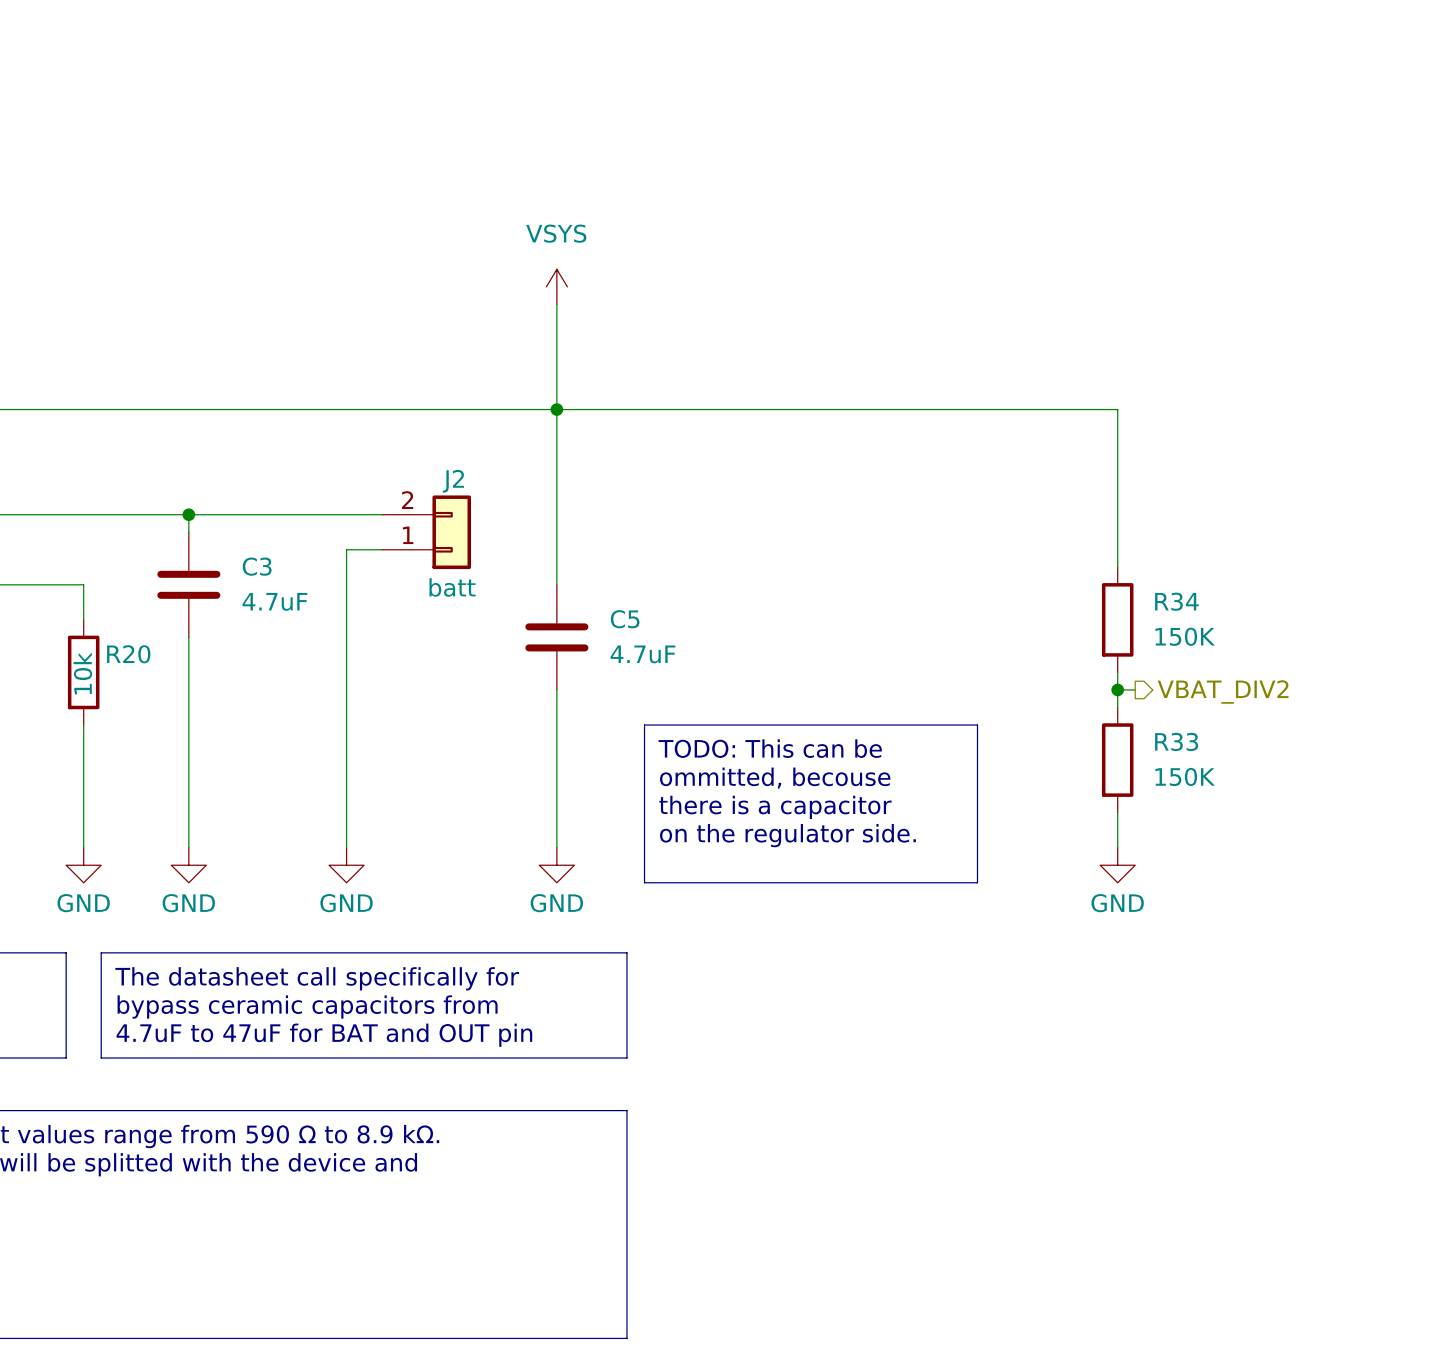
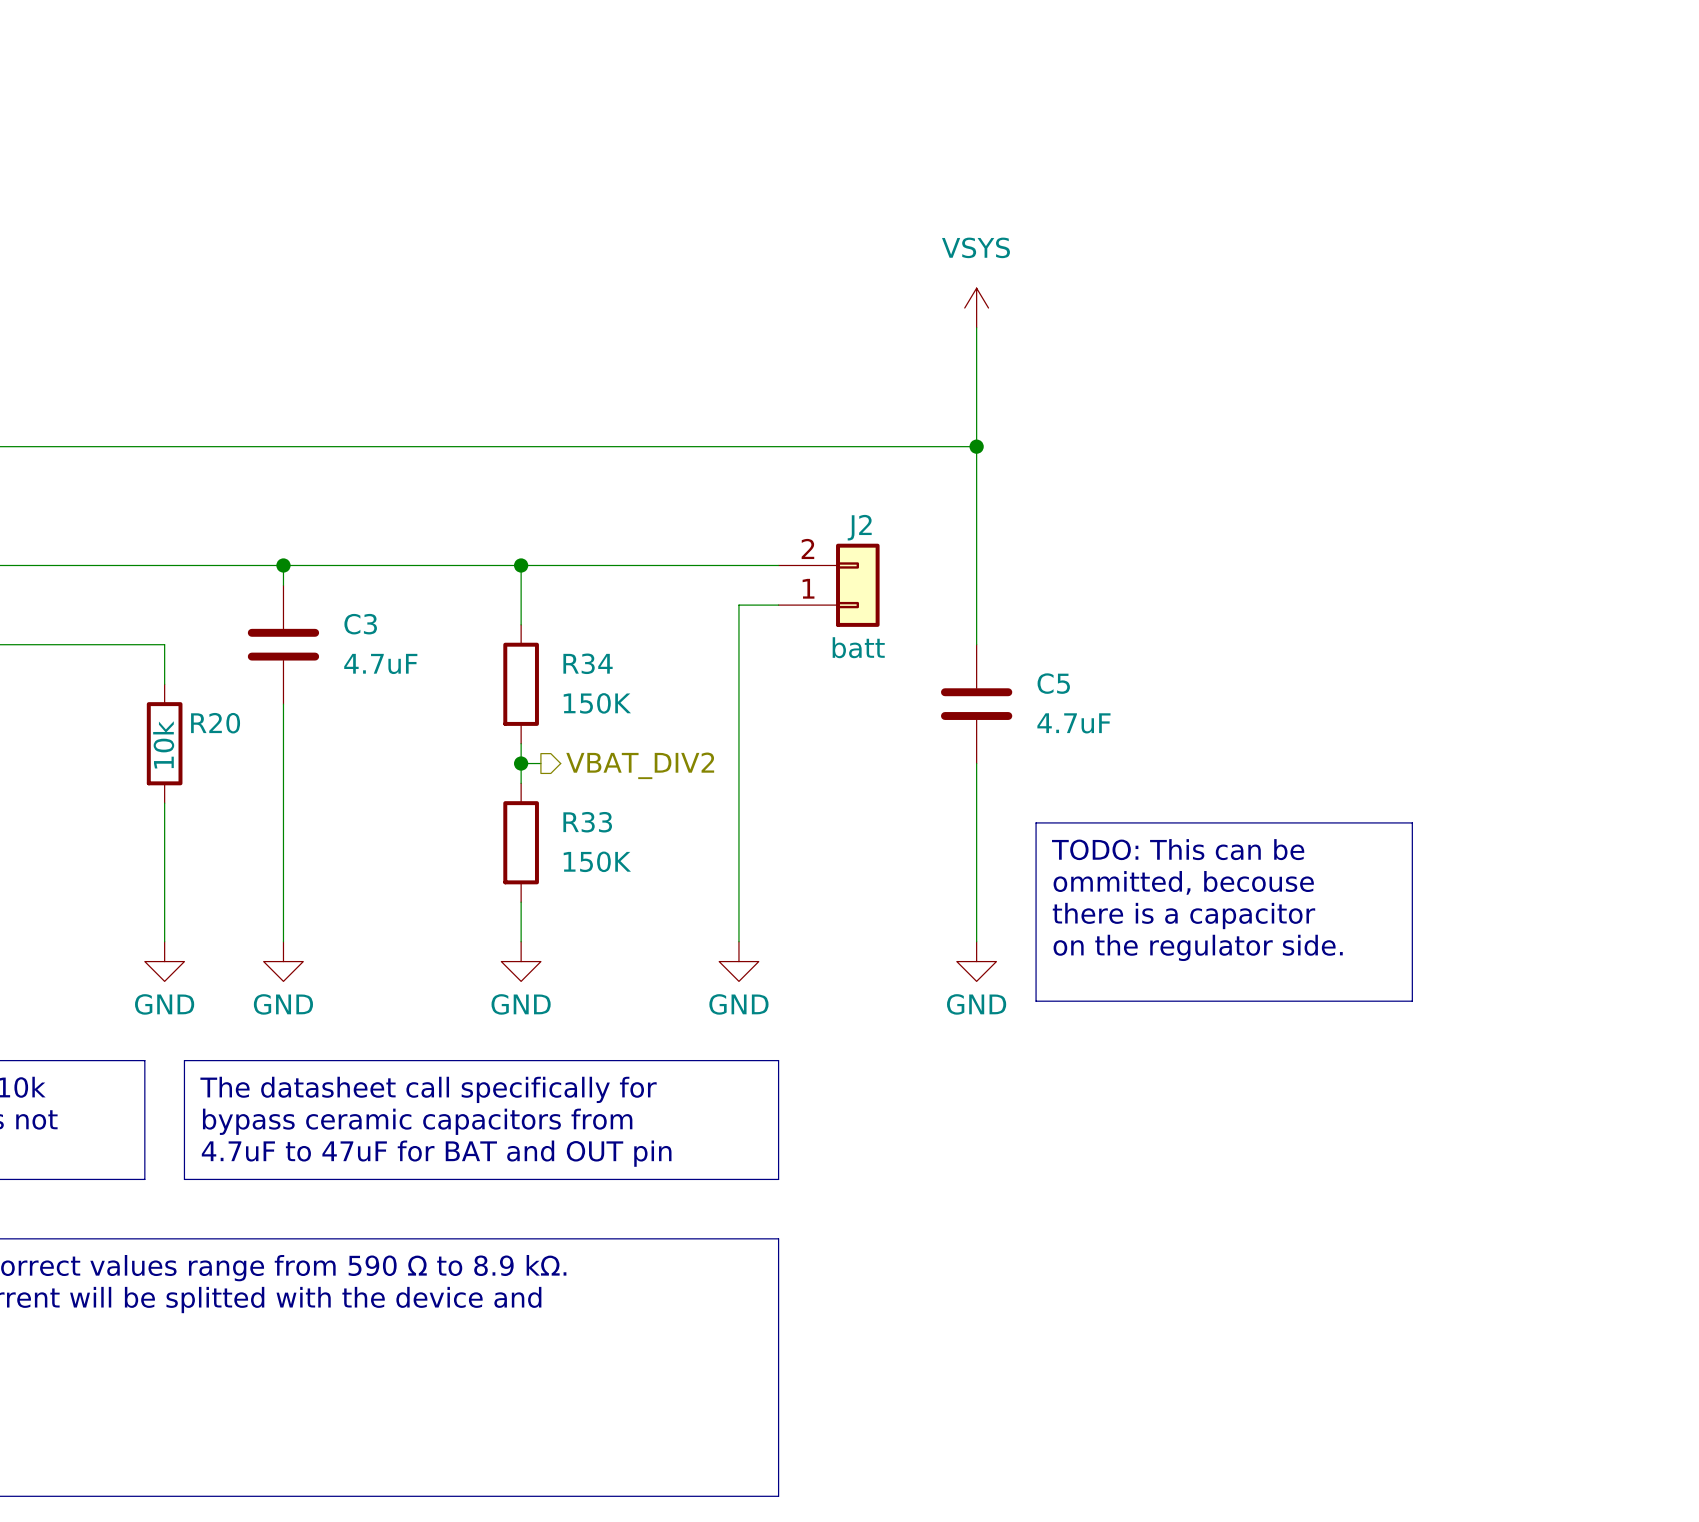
power symbol position: VSYS (556, 286) -> VSYS (976, 308)
wire: (556, 304) (556, 584) -> (976, 327) (976, 644)
junction: (556, 409) -> none
wire: (802, 409) (1117, 409) (1117, 567) -> none
junction: none -> (976, 446)
wire: none -> (501, 565) (778, 565)
wire: none -> (521, 565) (521, 624)
junction: none -> (521, 565)
J2 position: (426, 532) -> (829, 585)
wire: (381, 549) (346, 549) (346, 847) -> (778, 605) (738, 605) (738, 941)
R34 position: (1117, 619) -> (521, 684)
C5 position: (556, 637) -> (976, 704)
wire: none -> (521, 743) (521, 783)
wire: (1117, 672) (1117, 707) -> none
wire: none -> (521, 763) (540, 763)
junction: none -> (521, 763)
wire: (556, 689) (556, 847) -> (976, 763) (976, 941)
wire: (1117, 689) (1135, 689) -> none
junction: (1117, 689) -> none
hierarchical label: none -> VBAT_DIV2 (640, 765)
hierarchical label: VBAT_DIV2 (1223, 691) -> none
line: (644, 725) (977, 725) (977, 882) (644, 882) (644, 725) -> (1036, 822) (1412, 822) (1412, 1001) (1036, 1001) (1036, 822)
text position: TODO: This can be (770, 748) -> TODO: This can be (1178, 849)
R33 position: (1117, 760) -> (521, 842)
text position: ommitted, becouse (775, 778) -> ommitted, becouse (1183, 882)
text position: there is a capacitor (775, 807) -> there is a capacitor (1184, 916)
wire: none -> (521, 902) (521, 941)
wire: (1117, 812) (1117, 847) -> none
text position: on the regulator side. (787, 835) -> on the regulator side. (1198, 947)
power symbol position: GND (346, 865) -> GND (521, 961)
power symbol position: GND (556, 865) -> GND (738, 961)
power symbol: none -> GND (976, 961)
power symbol: GND (1117, 865) -> none

